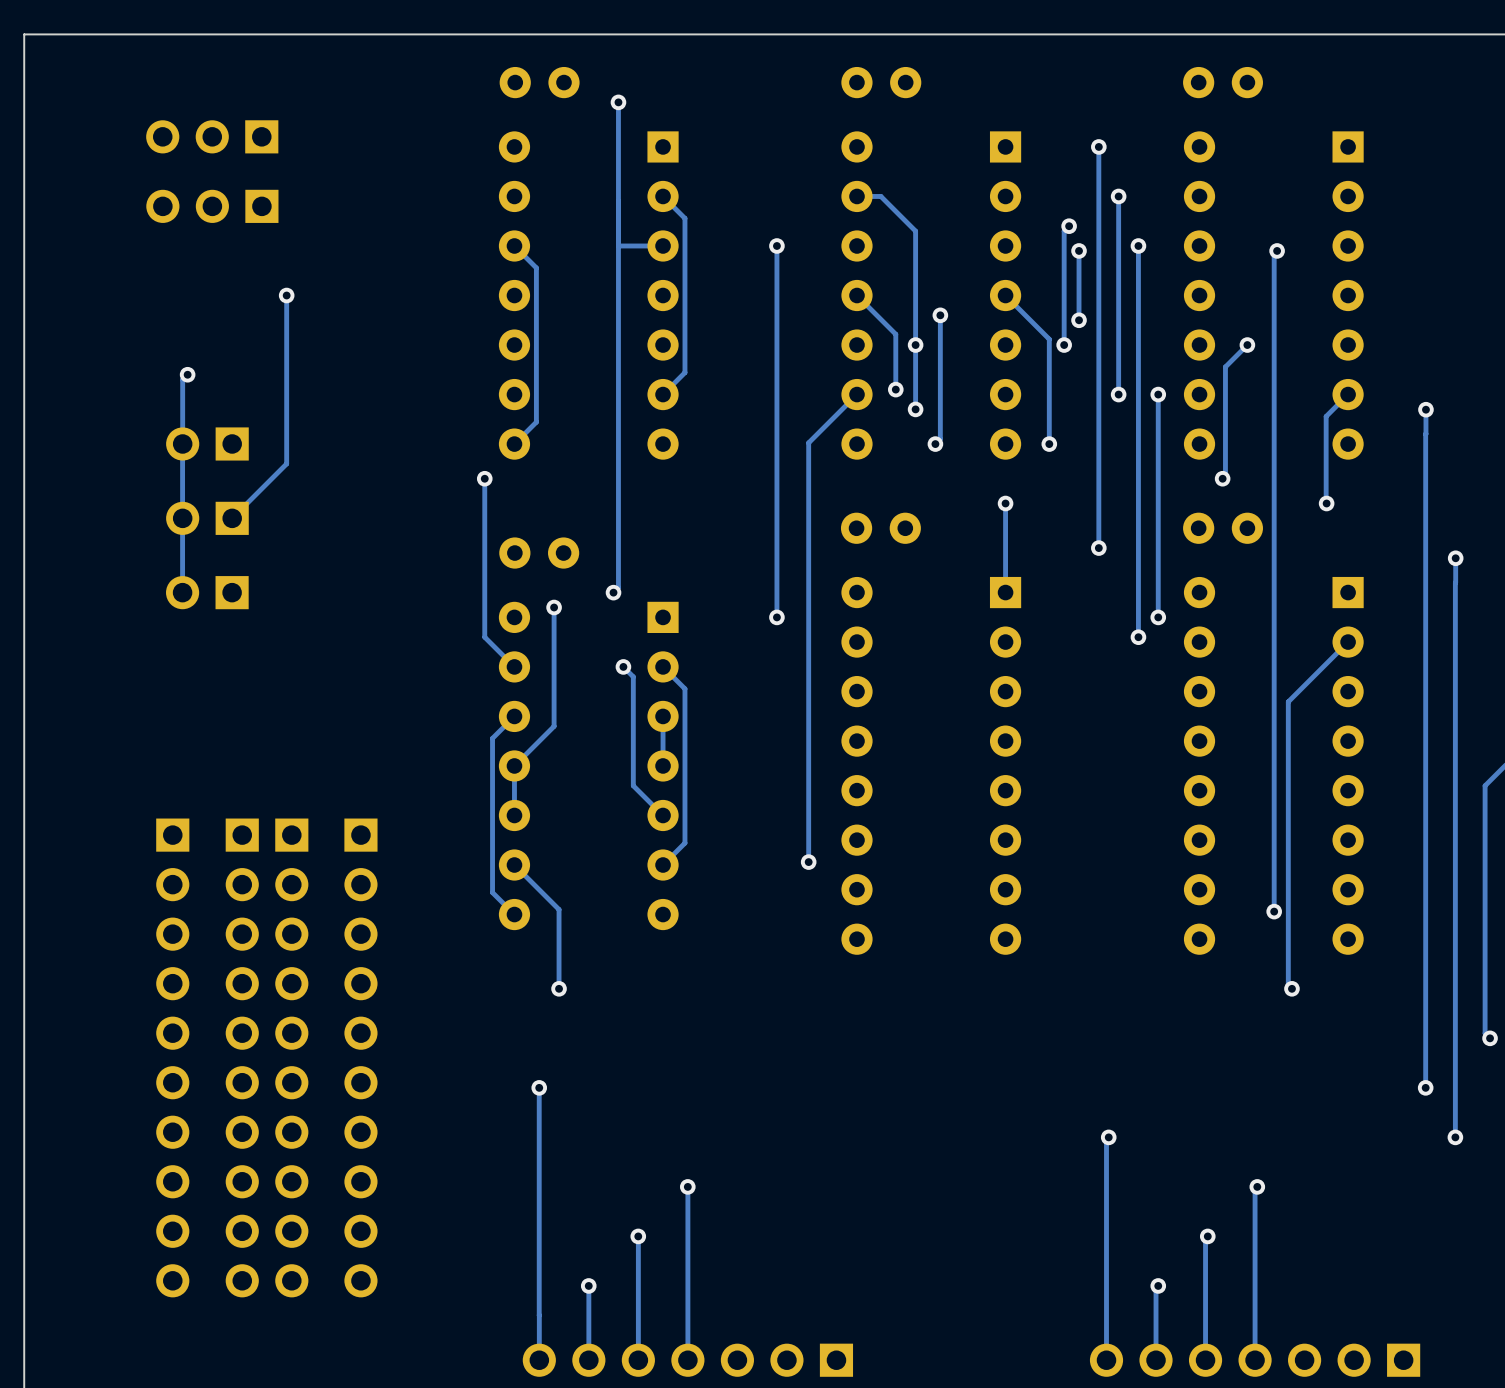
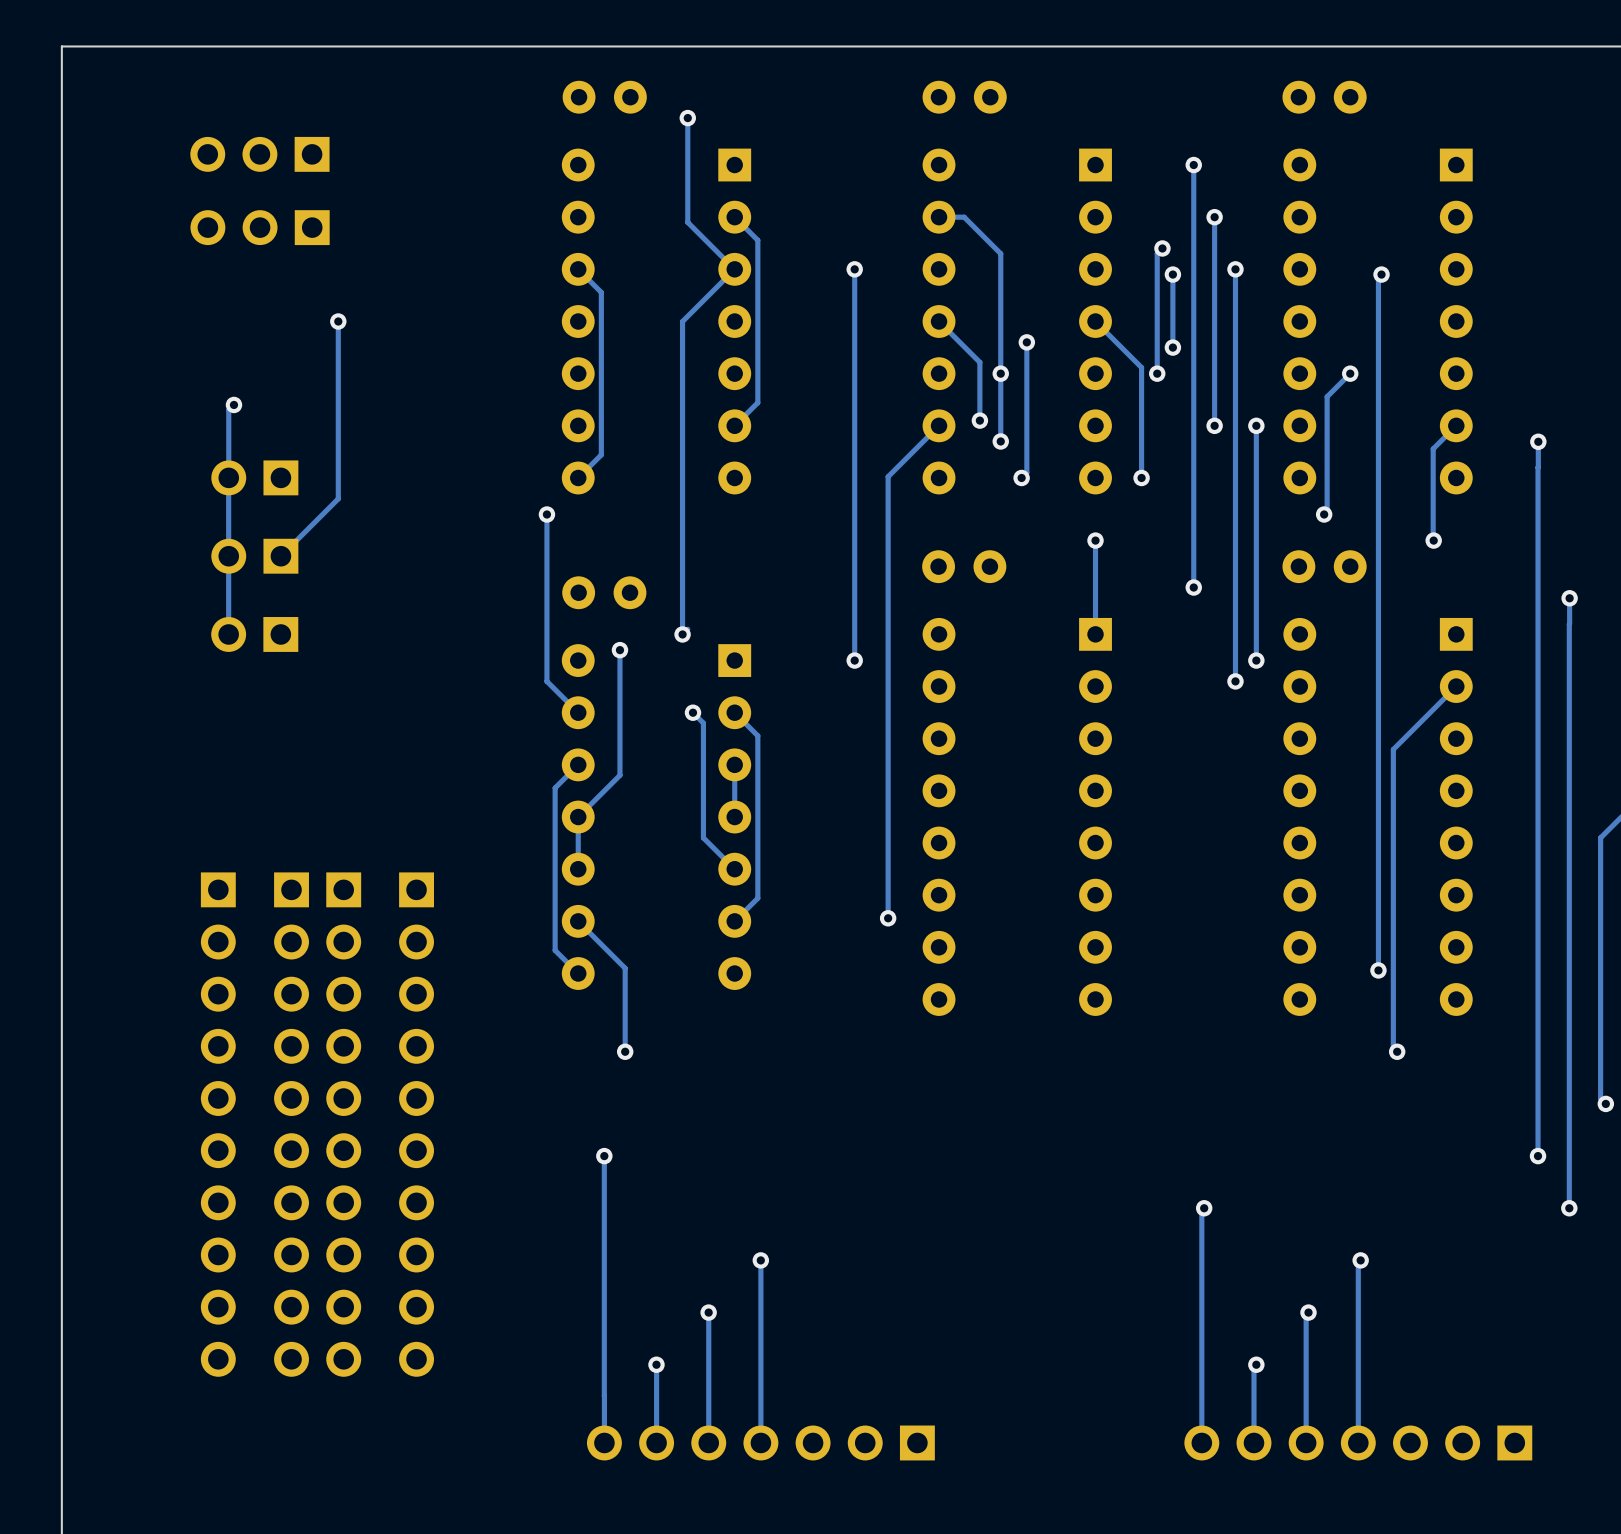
track: (618, 201) (618, 587) -> (687, 222) (734, 269) (682, 321) (682, 634)
track: (663, 245) (618, 245) -> none

